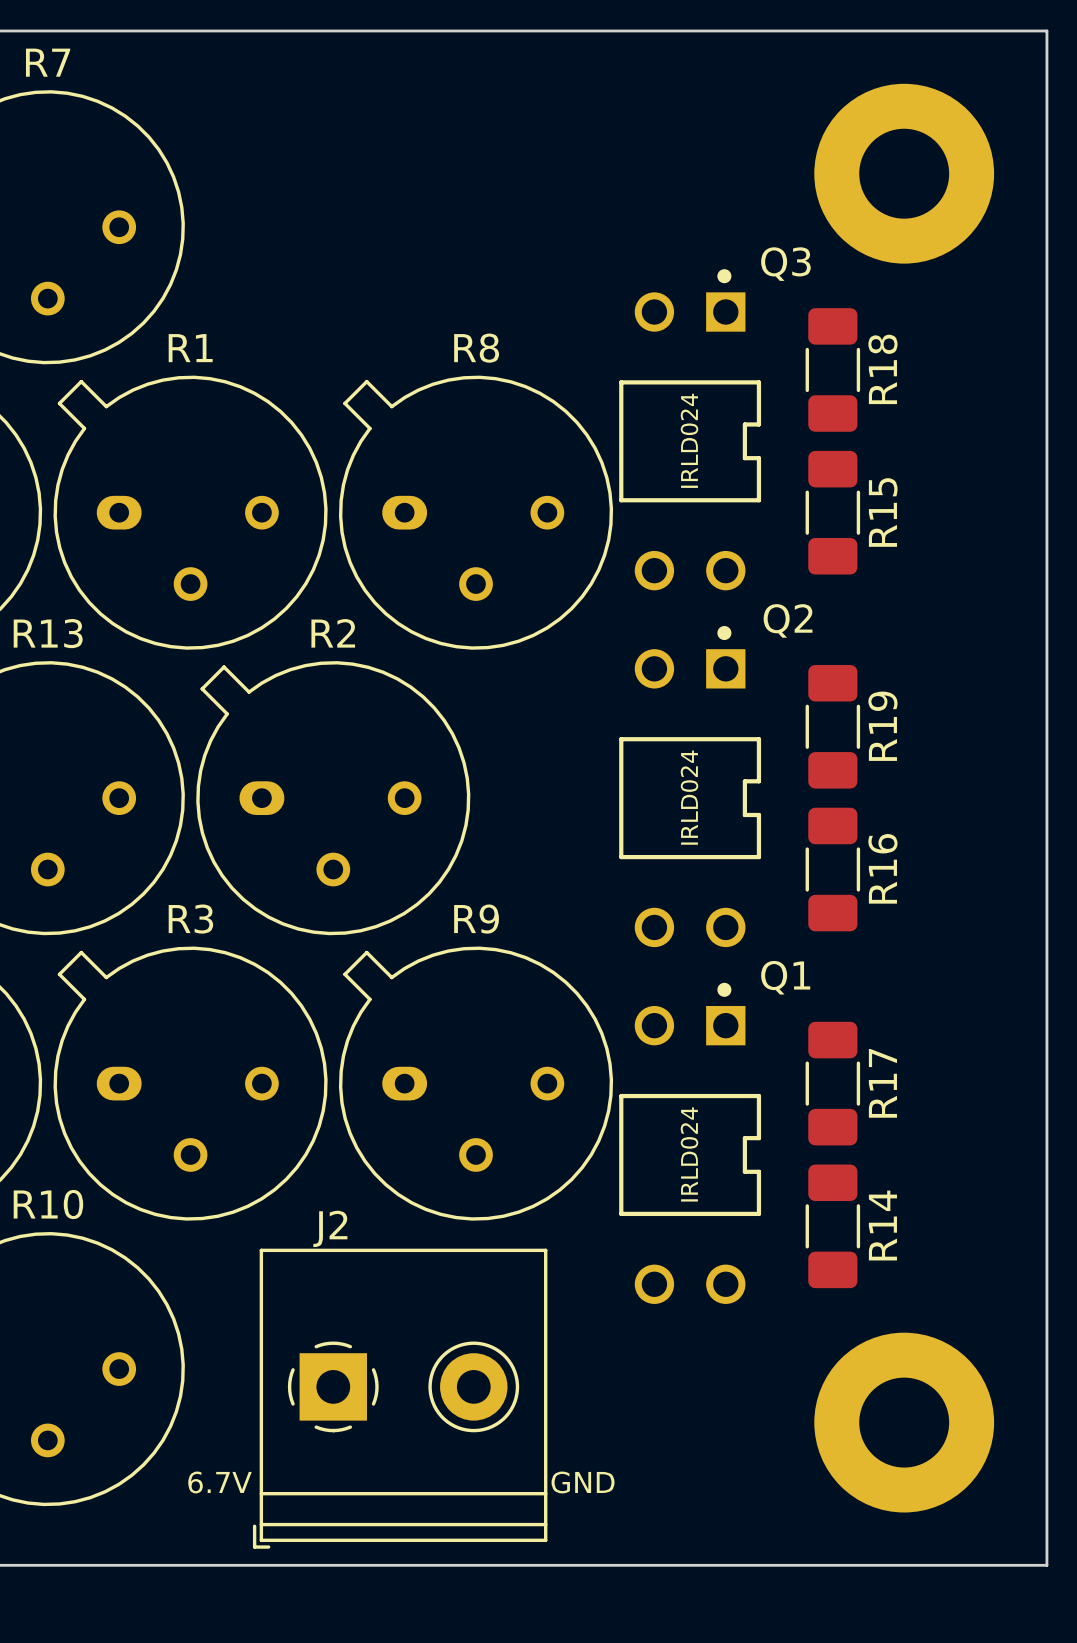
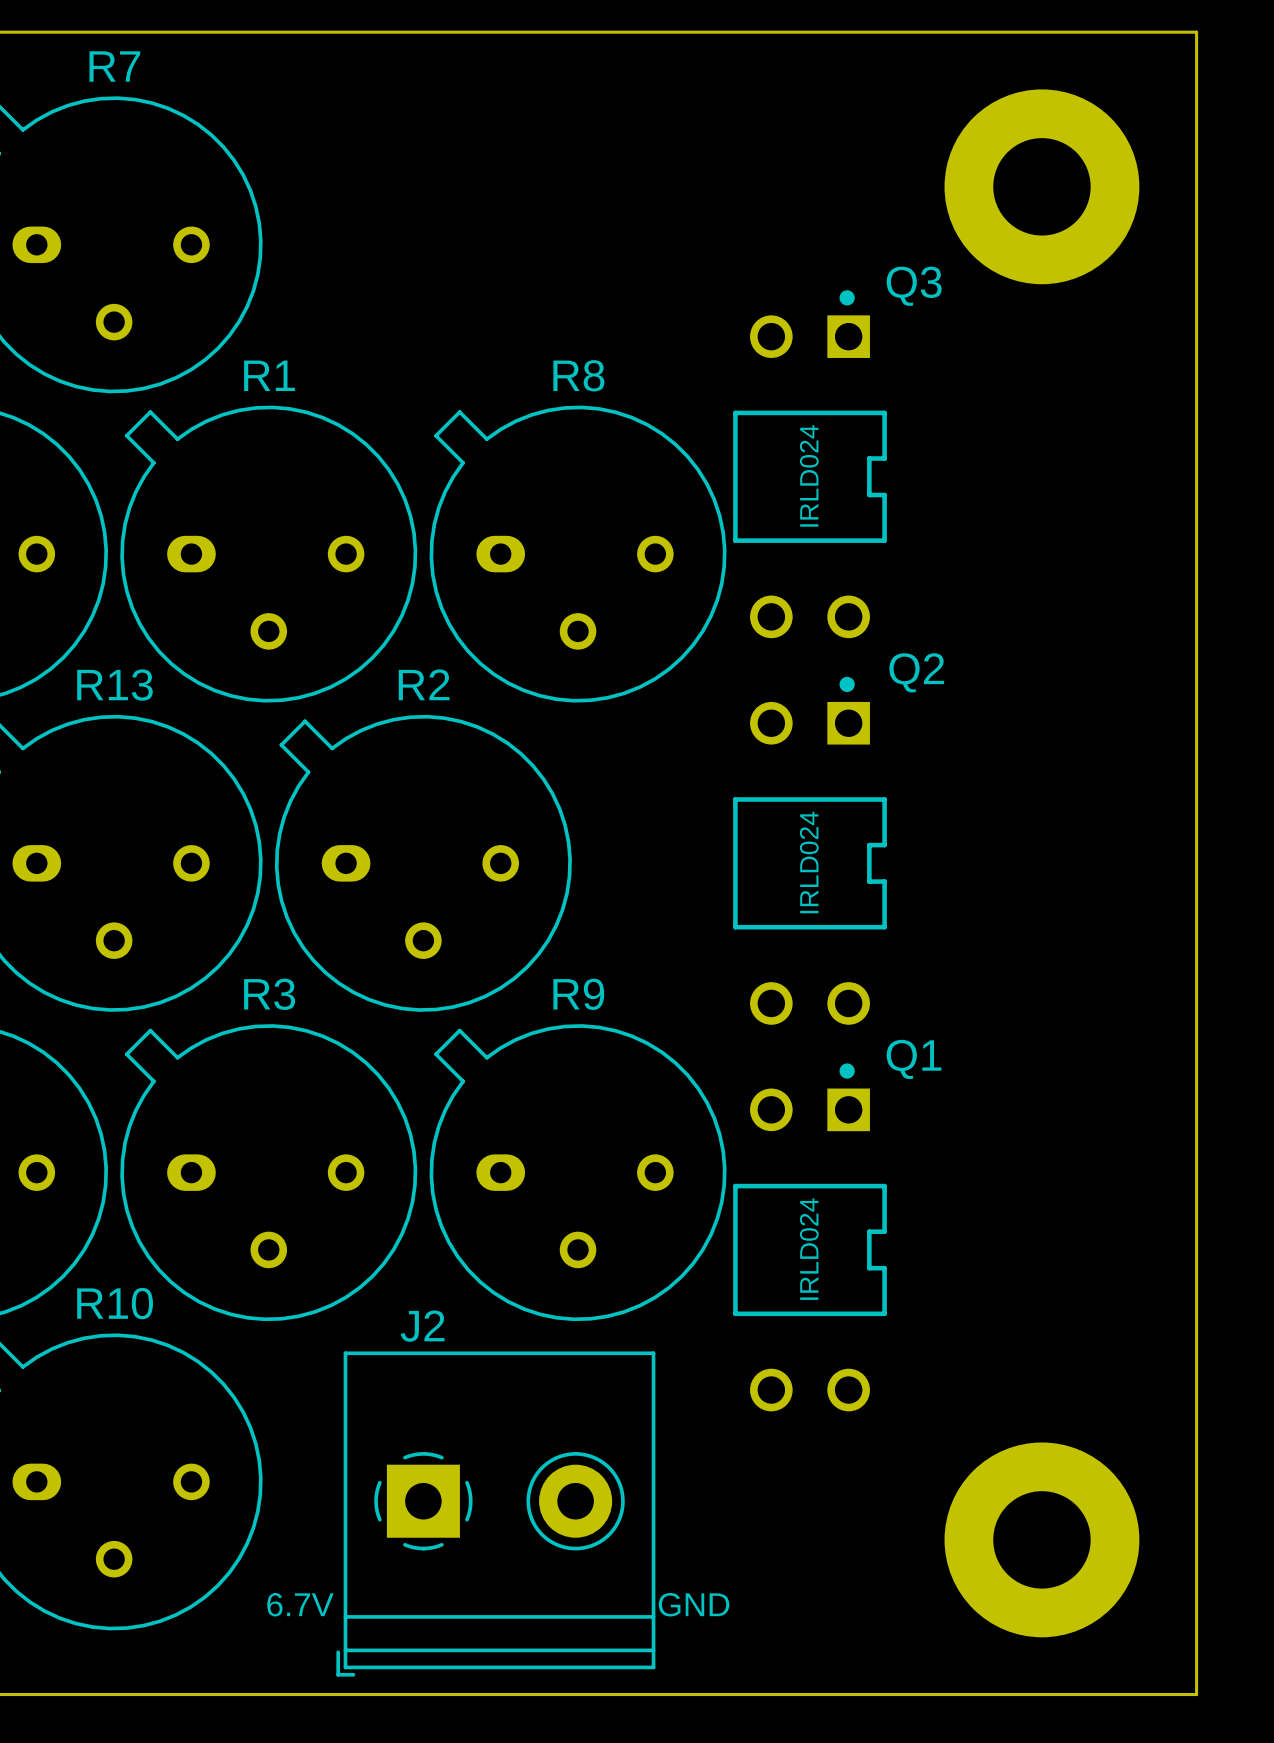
R18: (832, 369) -> none
R15: (832, 512) -> none
R19: (832, 726) -> none
R16: (832, 869) -> none
R17: (832, 1083) -> none
R14: (832, 1226) -> none

